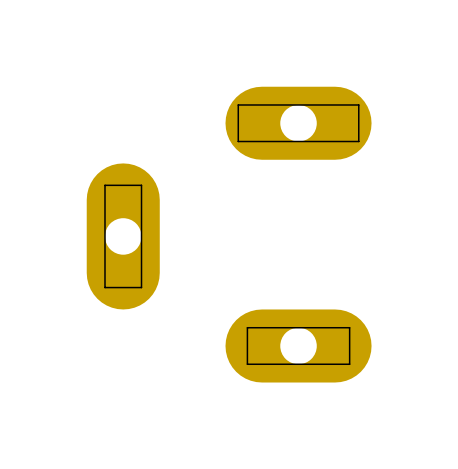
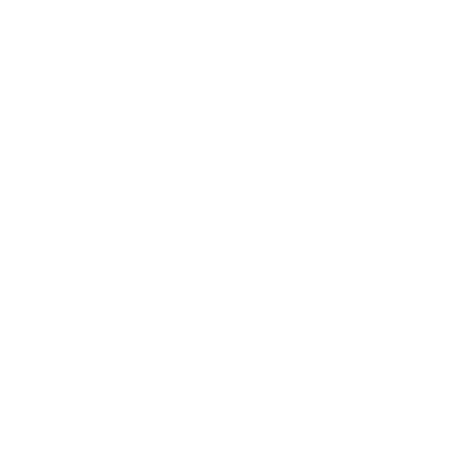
part: (229, 234) -> none

